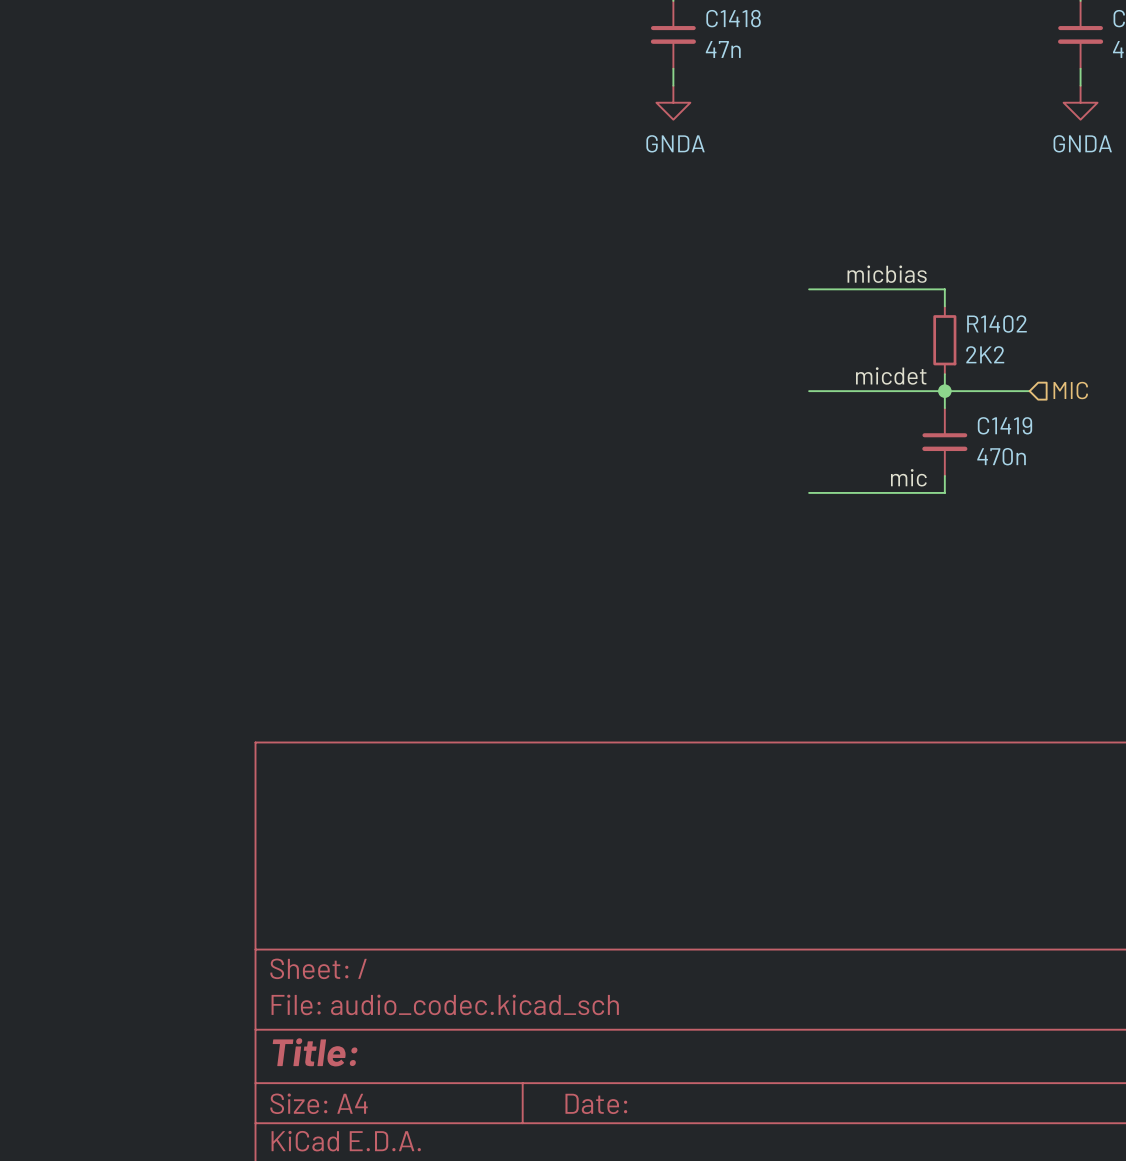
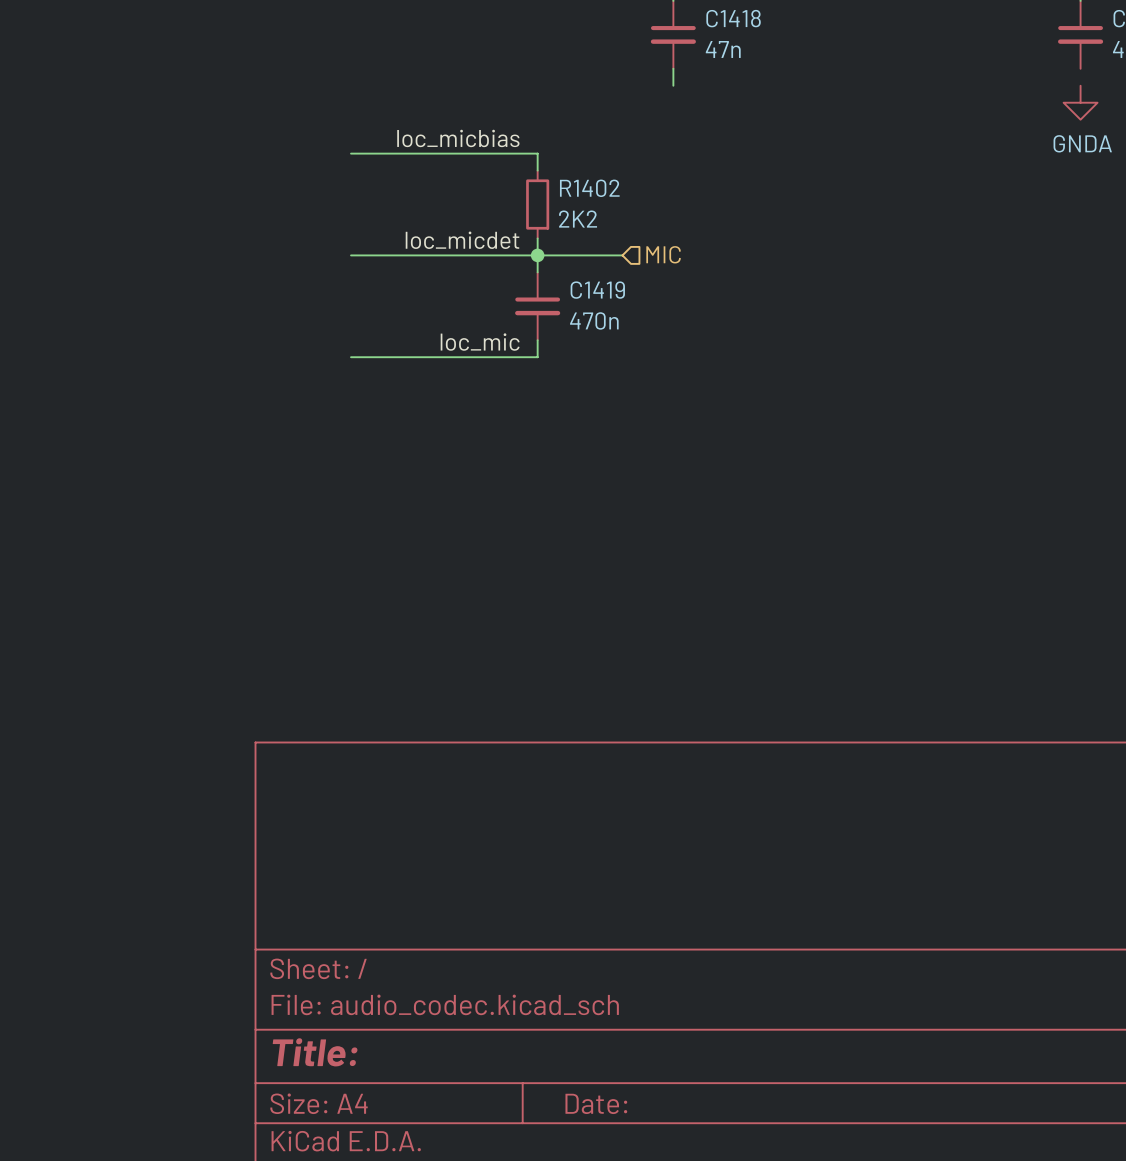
wire: (1080, 68) (1080, 85) -> none
power symbol: GNDA (673, 102) -> none
label: none -> loc_micbias (458, 138)
wire: none -> (351, 153) (537, 153) (537, 170)
wire: none -> (537, 238) (537, 272)
label: none -> loc_micdet (462, 240)
hierarchical label: none -> MIC (663, 254)
wire: none -> (351, 255) (622, 255)
junction: none -> (537, 255)
label: micbias (887, 274) -> none
wire: (809, 289) (944, 289) (944, 306) -> none
wire: none -> (537, 340) (537, 357) (351, 357)
R1402 position: (944, 340) -> (537, 204)
label: none -> loc_mic (480, 342)
wire: (944, 374) (944, 408) -> none
label: micdet (891, 375) -> none
hierarchical label: MIC (1070, 390) -> none
wire: (809, 391) (1029, 391) -> none
junction: (944, 391) -> none
C1419 position: (944, 442) -> (537, 306)
wire: (944, 475) (944, 492) (809, 492) -> none
label: mic (908, 477) -> none

